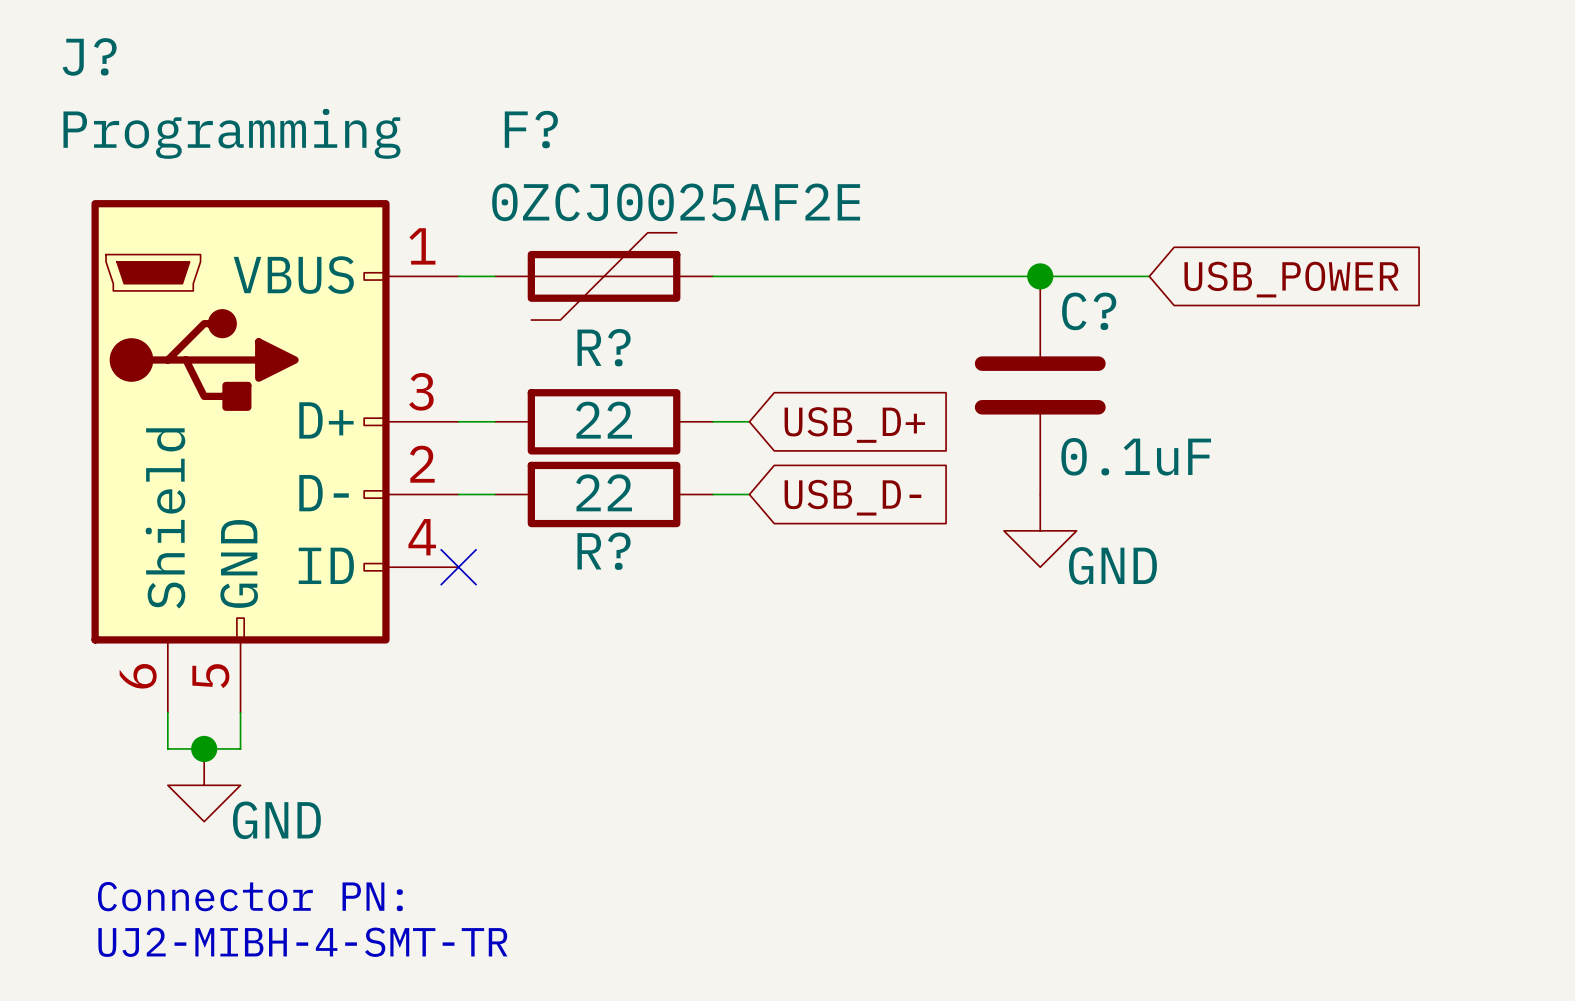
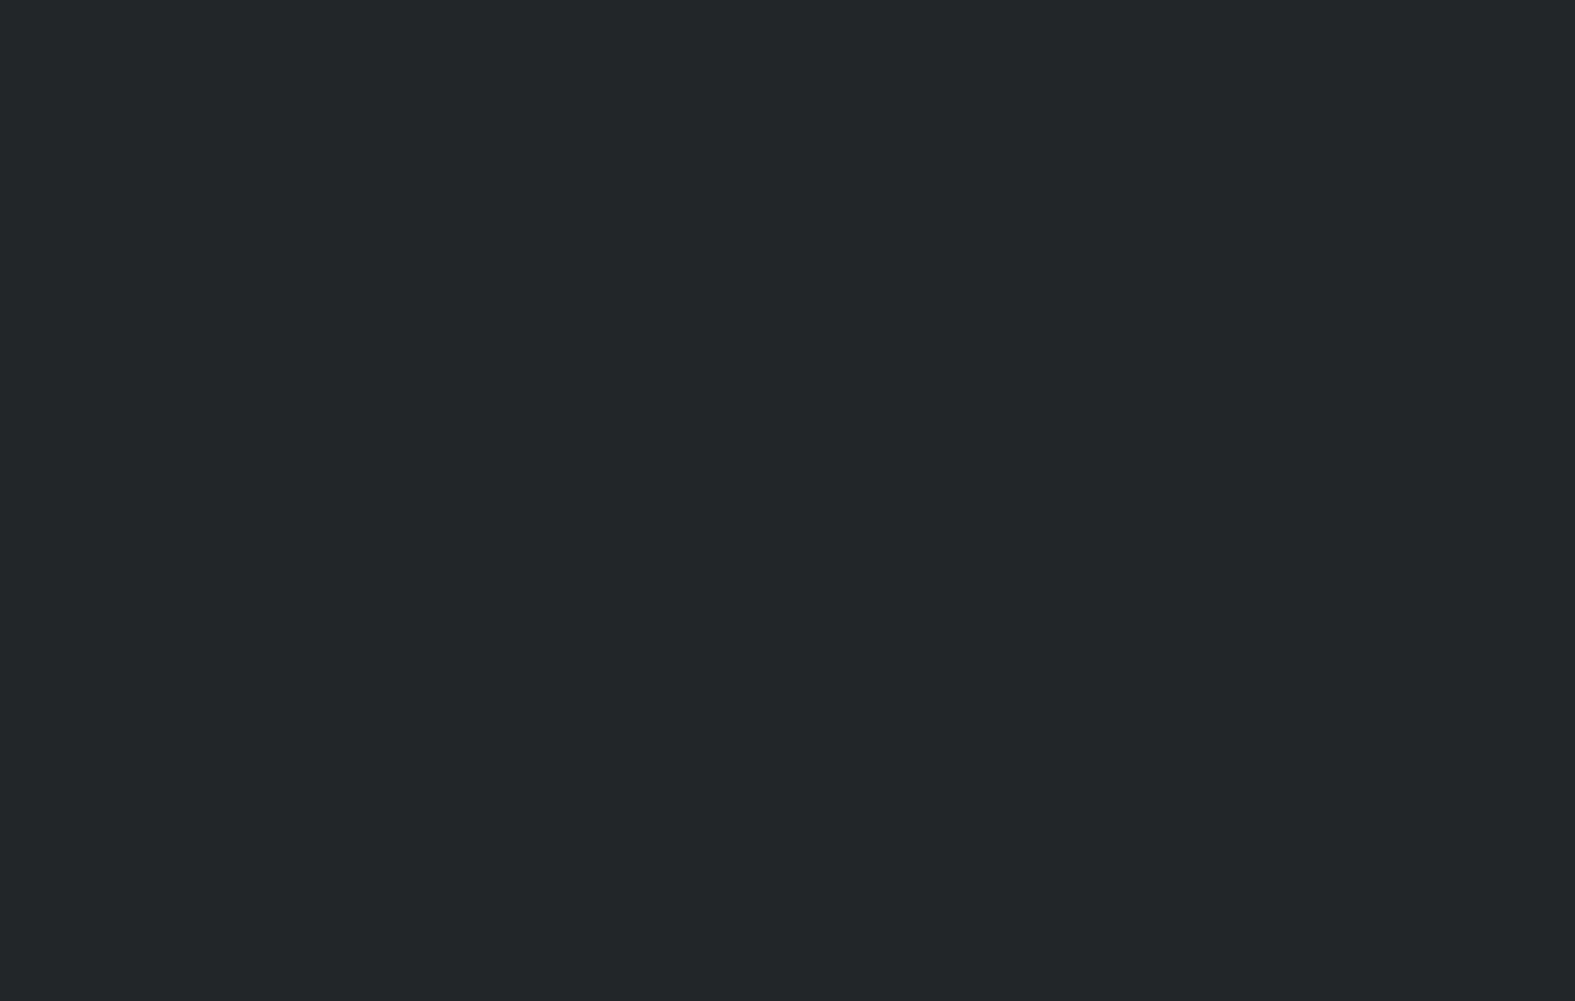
wire: (458, 276) (494, 276) -> none
F?: 0ZCJ0025AF2E (604, 276) -> none
wire: (713, 276) (1149, 276) -> none
junction: (1040, 276) -> none
global label: USB_POWER (1291, 279) -> none
C?: 0.1uF (1040, 385) -> none
wire: (458, 421) (494, 421) -> none
R?: 22 (604, 421) -> none
wire: (713, 421) (749, 421) -> none
global label: USB_D+ (854, 424) -> none
J?: Programming (275, 456) -> none
wire: (458, 494) (494, 494) -> none
R?: 22 (604, 494) -> none
wire: (713, 494) (749, 494) -> none
global label: USB_D- (852, 497) -> none
power symbol: GND (1040, 530) -> none
no-connect mark: (458, 567) -> none
wire: (167, 712) (167, 748) (240, 748) (240, 712) -> none
junction: (204, 748) -> none
power symbol: GND (204, 785) -> none
text: Connector PN: (250, 896) -> none
text: UJ2-MIBH-4-SMT-TR (302, 942) -> none

